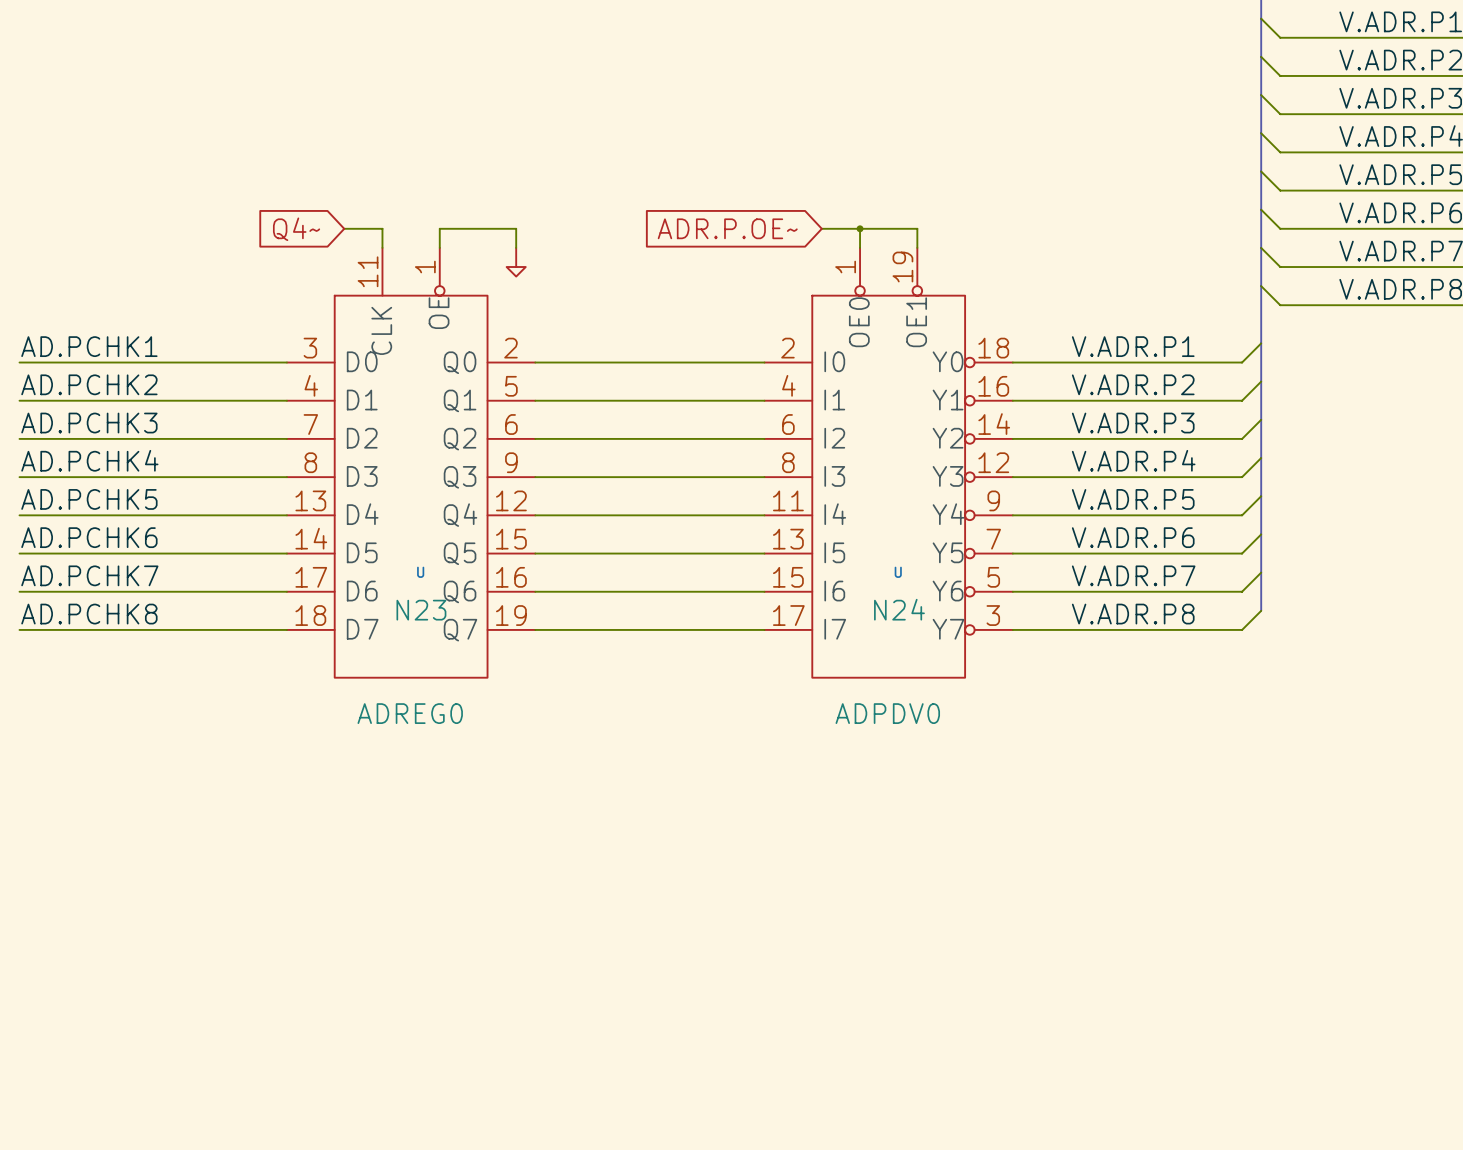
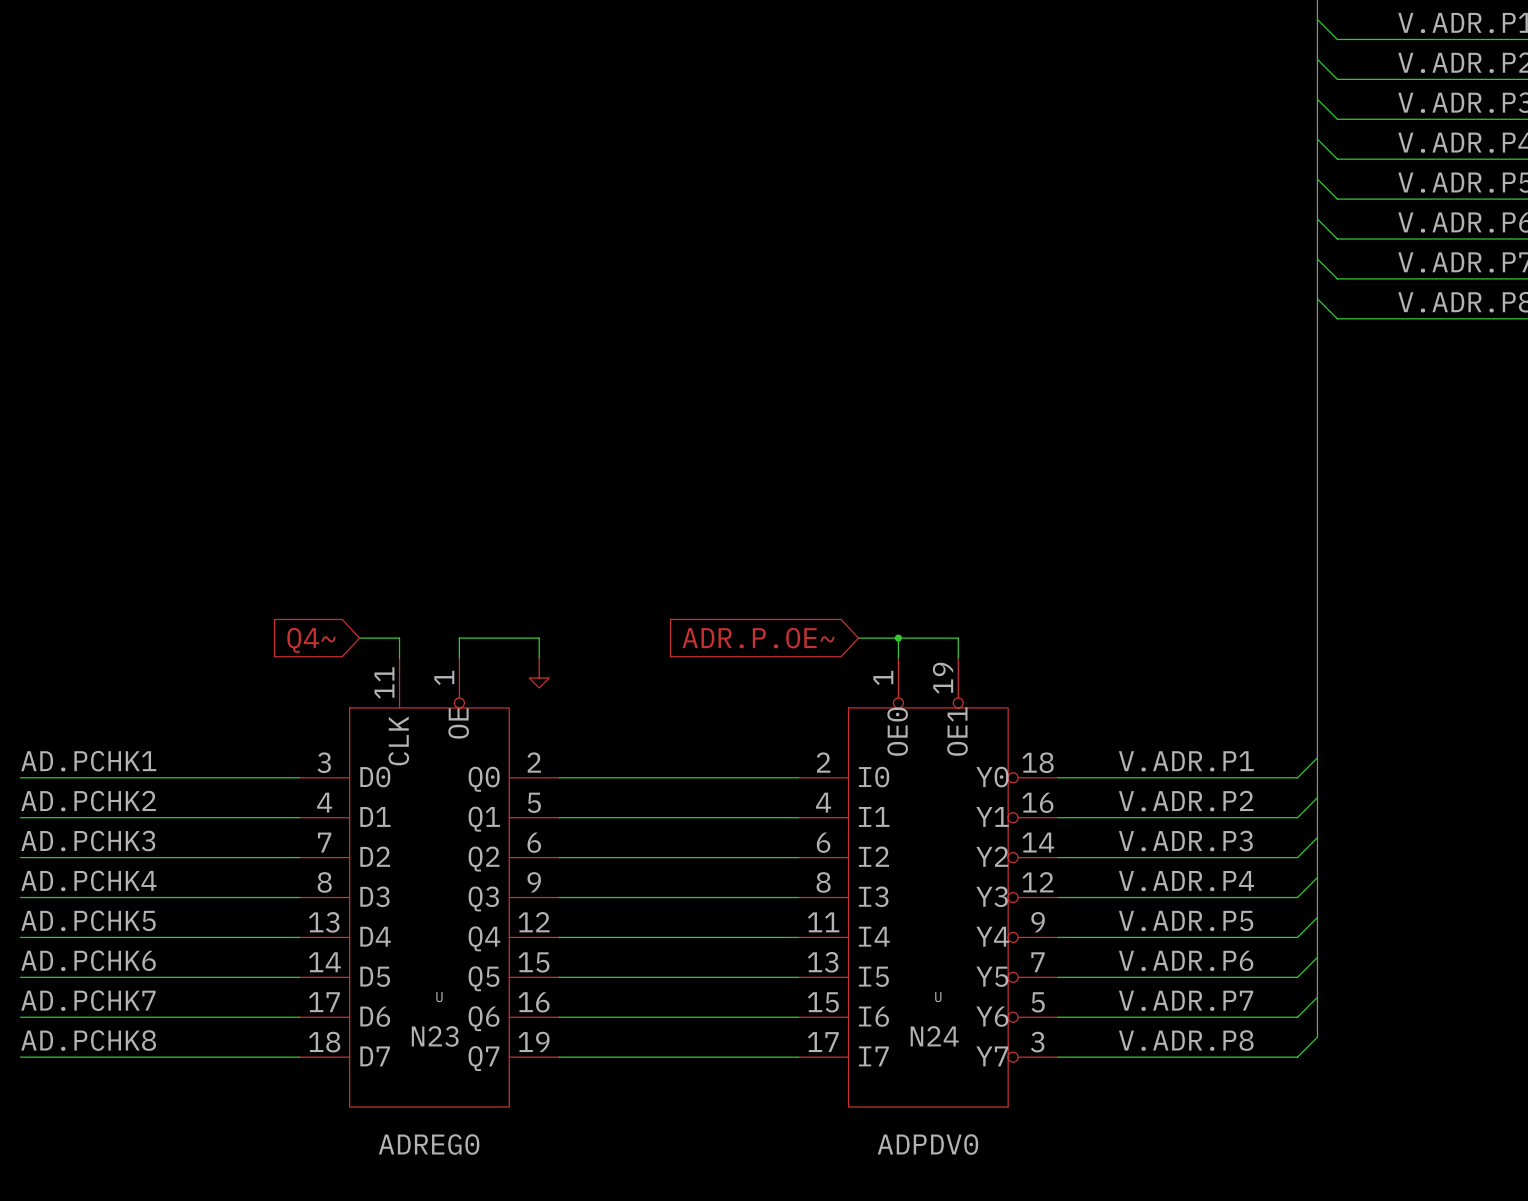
wire: (344, 228) (382, 228) (382, 247) -> none
global label: ADR.P.OE~ (727, 228) -> none
wire: (821, 228) (917, 228) (917, 247) -> none
wire: (860, 228) (860, 247) -> none
junction: (860, 228) -> none
global label: Q4~ (296, 229) -> none
wire: (439, 247) (439, 228) (516, 228) (516, 247) -> none
power symbol: (516, 262) -> none
wire: (1261, 343) (1242, 362) (1012, 362) -> none
label: AD.PCHK1 (89, 346) -> none
label: V.ADR.P1 (1133, 346) -> none
wire: (19, 362) (286, 362) -> none
wire: (535, 362) (764, 362) -> none
wire: (1261, 381) (1242, 400) (1012, 400) -> none
label: AD.PCHK2 (89, 384) -> none
label: V.ADR.P2 (1133, 384) -> none
wire: (19, 400) (286, 400) -> none
wire: (535, 400) (764, 400) -> none
wire: (1261, 419) (1242, 438) (1012, 438) -> none
label: AD.PCHK3 (89, 423) -> none
label: V.ADR.P3 (1133, 423) -> none
wire: (19, 438) (286, 438) -> none
wire: (535, 438) (764, 438) -> none
wire: (1261, 458) (1242, 477) (1012, 477) -> none
label: AD.PCHK4 (89, 460) -> none
label: V.ADR.P4 (1133, 460) -> none
U: (411, 462) -> none
U: (888, 462) -> none
wire: (19, 477) (286, 477) -> none
wire: (535, 477) (764, 477) -> none
wire: (1261, 496) (1242, 515) (1012, 515) -> none
label: AD.PCHK5 (89, 499) -> none
label: V.ADR.P5 (1133, 499) -> none
wire: (19, 515) (286, 515) -> none
wire: (535, 515) (764, 515) -> none
wire: (1261, 534) (1242, 553) (1012, 553) -> none
label: AD.PCHK6 (89, 537) -> none
label: V.ADR.P6 (1133, 537) -> none
wire: (19, 553) (286, 553) -> none
wire: (535, 553) (764, 553) -> none
wire: (1261, 572) (1242, 591) (1012, 591) -> (1317, 757) (1297, 777) (1058, 777)
label: AD.PCHK7 (89, 575) -> none
label: V.ADR.P7 (1133, 575) -> none
wire: (19, 591) (286, 591) -> (20, 777) (299, 777)
wire: (535, 591) (764, 591) -> (559, 777) (798, 777)
wire: none -> (359, 638) (399, 638) (399, 658)
global label: none -> ADR.P.OE~ (758, 638)
wire: none -> (858, 638) (958, 638) (958, 658)
wire: none -> (898, 638) (898, 658)
junction: none -> (898, 638)
wire: (1261, 610) (1242, 629) (1012, 629) -> (1317, 797) (1297, 817) (1058, 817)
bus: none -> (1317, 638) (1317, 1037)
global label: none -> Q4~ (311, 640)
label: AD.PCHK8 (89, 614) -> none
label: V.ADR.P8 (1133, 614) -> none
wire: (19, 629) (286, 629) -> (20, 817) (299, 817)
wire: none -> (459, 658) (459, 638) (539, 638) (539, 658)
wire: (535, 629) (764, 629) -> (559, 817) (798, 817)
power symbol: none -> (539, 673)
label: none -> AD.PCHK1 (88, 761)
label: none -> V.ADR.P1 (1186, 761)
label: none -> AD.PCHK2 (88, 801)
label: none -> V.ADR.P2 (1186, 801)
wire: none -> (1317, 837) (1297, 857) (1058, 857)
label: none -> AD.PCHK3 (88, 841)
label: none -> V.ADR.P3 (1185, 841)
wire: none -> (20, 857) (299, 857)
wire: none -> (559, 857) (798, 857)
wire: none -> (1317, 877) (1297, 897) (1058, 897)
label: none -> AD.PCHK4 (88, 880)
label: none -> V.ADR.P4 (1186, 881)
U: none -> (429, 882)
U: none -> (928, 882)
wire: none -> (20, 897) (299, 897)
wire: none -> (559, 897) (798, 897)
wire: none -> (1317, 917) (1297, 937) (1058, 937)
label: none -> AD.PCHK5 (88, 920)
label: none -> V.ADR.P5 (1186, 920)
wire: none -> (20, 937) (299, 937)
wire: none -> (559, 937) (798, 937)
wire: none -> (1317, 957) (1297, 977) (1058, 977)
label: none -> AD.PCHK6 (88, 960)
label: none -> V.ADR.P6 (1186, 960)
wire: none -> (20, 977) (299, 977)
wire: none -> (559, 977) (798, 977)
wire: none -> (1317, 997) (1297, 1017) (1058, 1017)
label: none -> AD.PCHK7 (88, 1000)
label: none -> V.ADR.P7 (1186, 1000)
wire: none -> (20, 1017) (299, 1017)
wire: none -> (559, 1017) (798, 1017)
wire: none -> (1317, 1037) (1297, 1057) (1058, 1057)
label: none -> AD.PCHK8 (88, 1040)
label: none -> V.ADR.P8 (1186, 1040)
wire: none -> (20, 1057) (299, 1057)
wire: none -> (559, 1057) (798, 1057)

